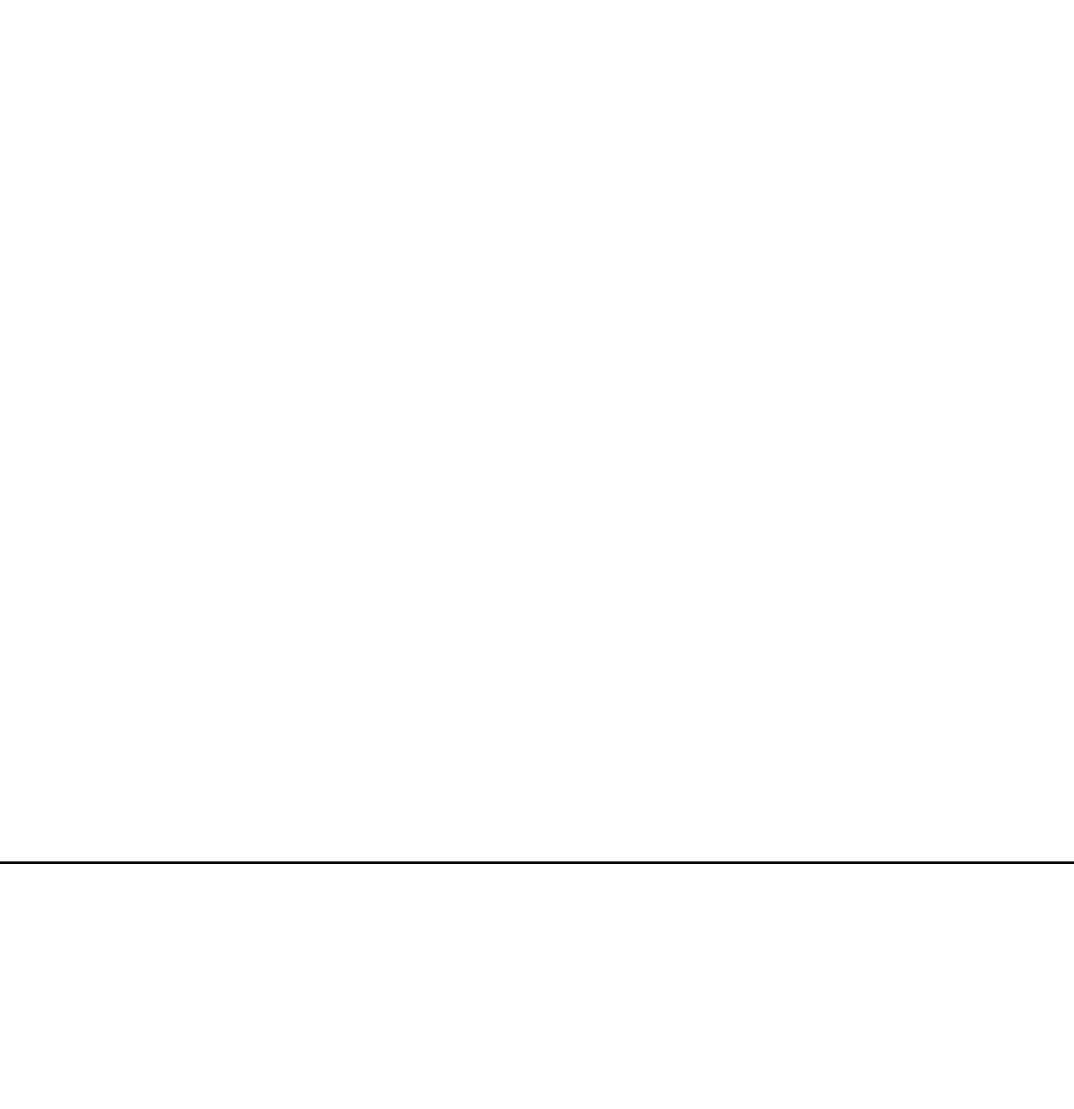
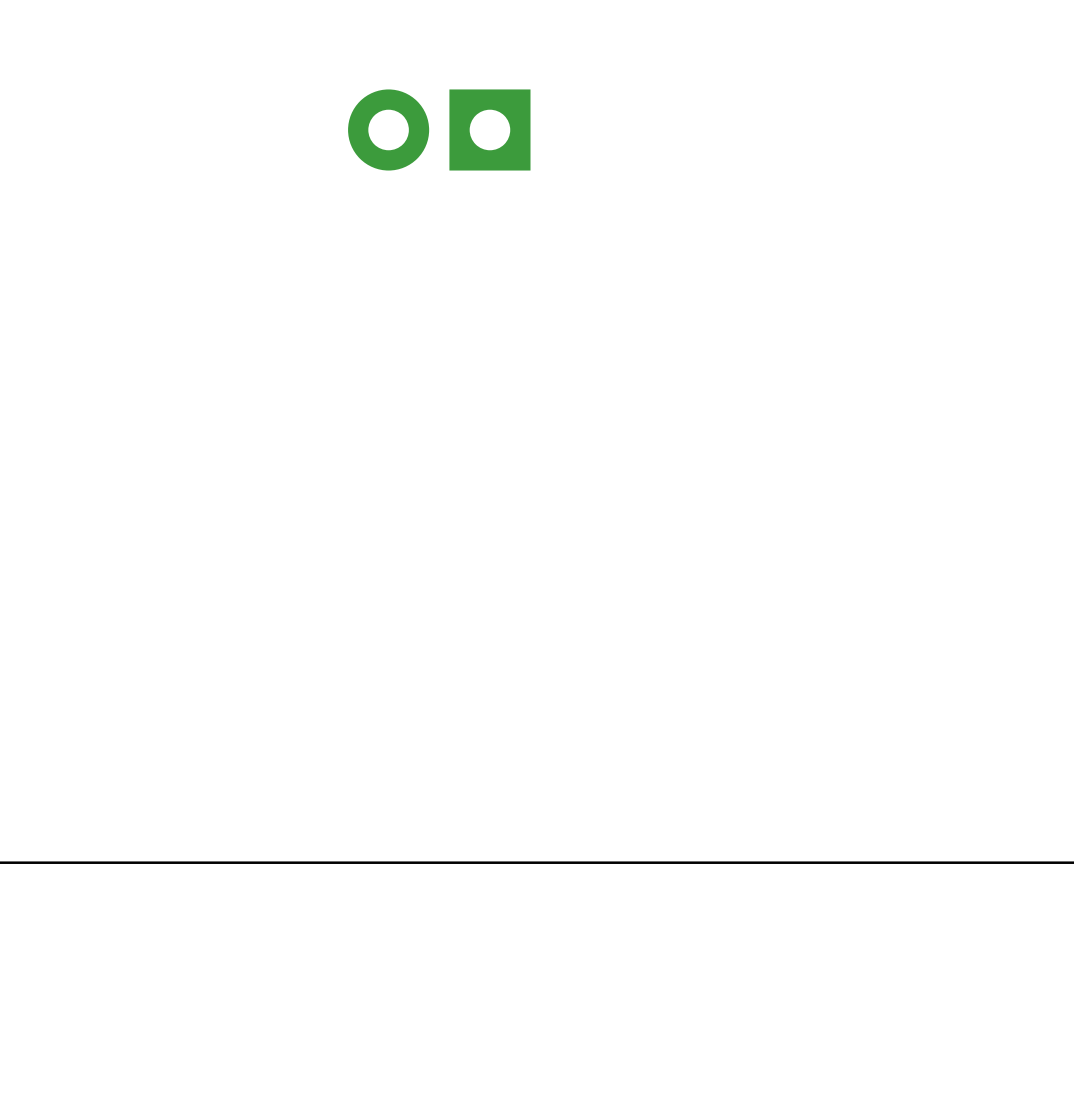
part: none -> (439, 129)

